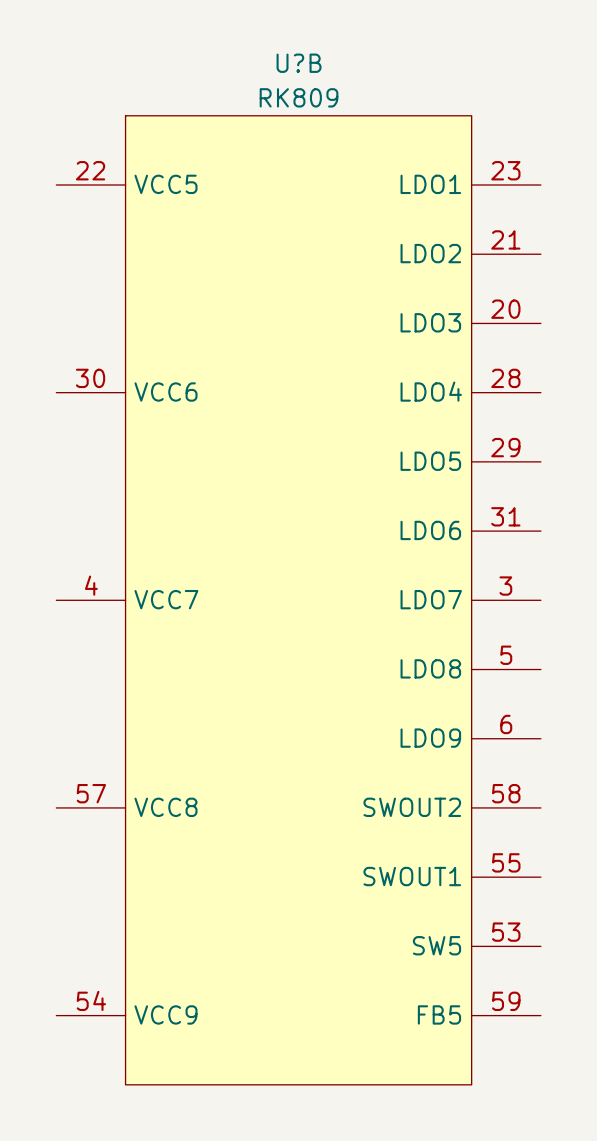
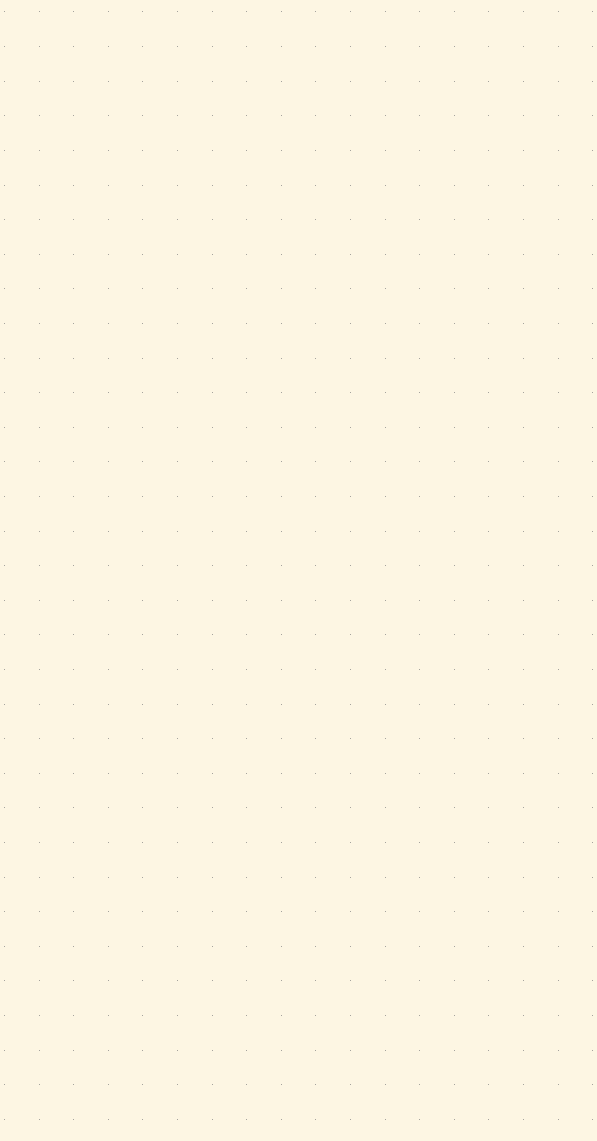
U?B: RK809 (298, 600) -> none

